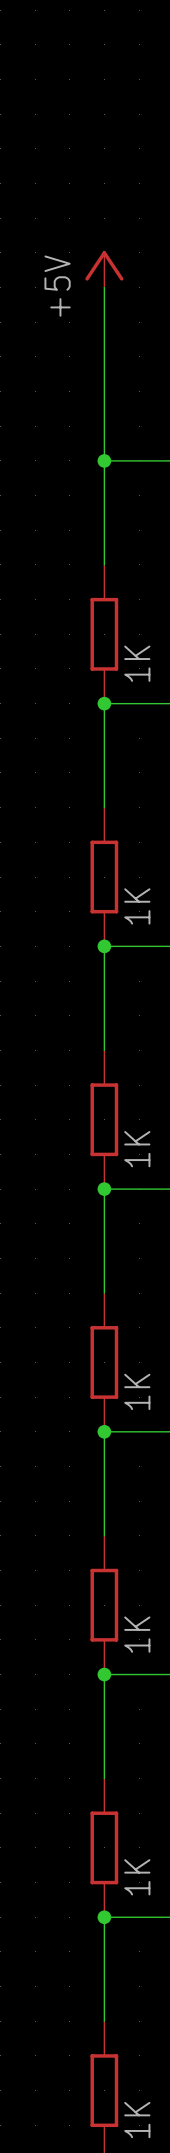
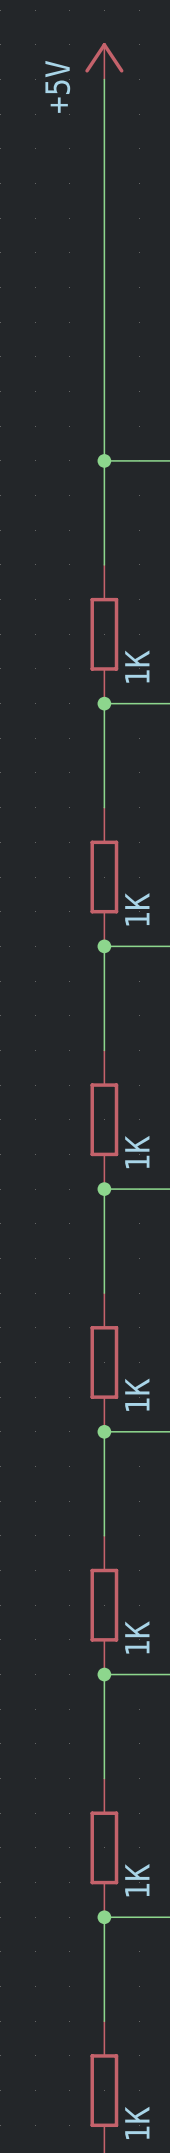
wire: none -> (104, 79) (104, 287)
power symbol position: +5V (104, 269) -> +5V (104, 61)

